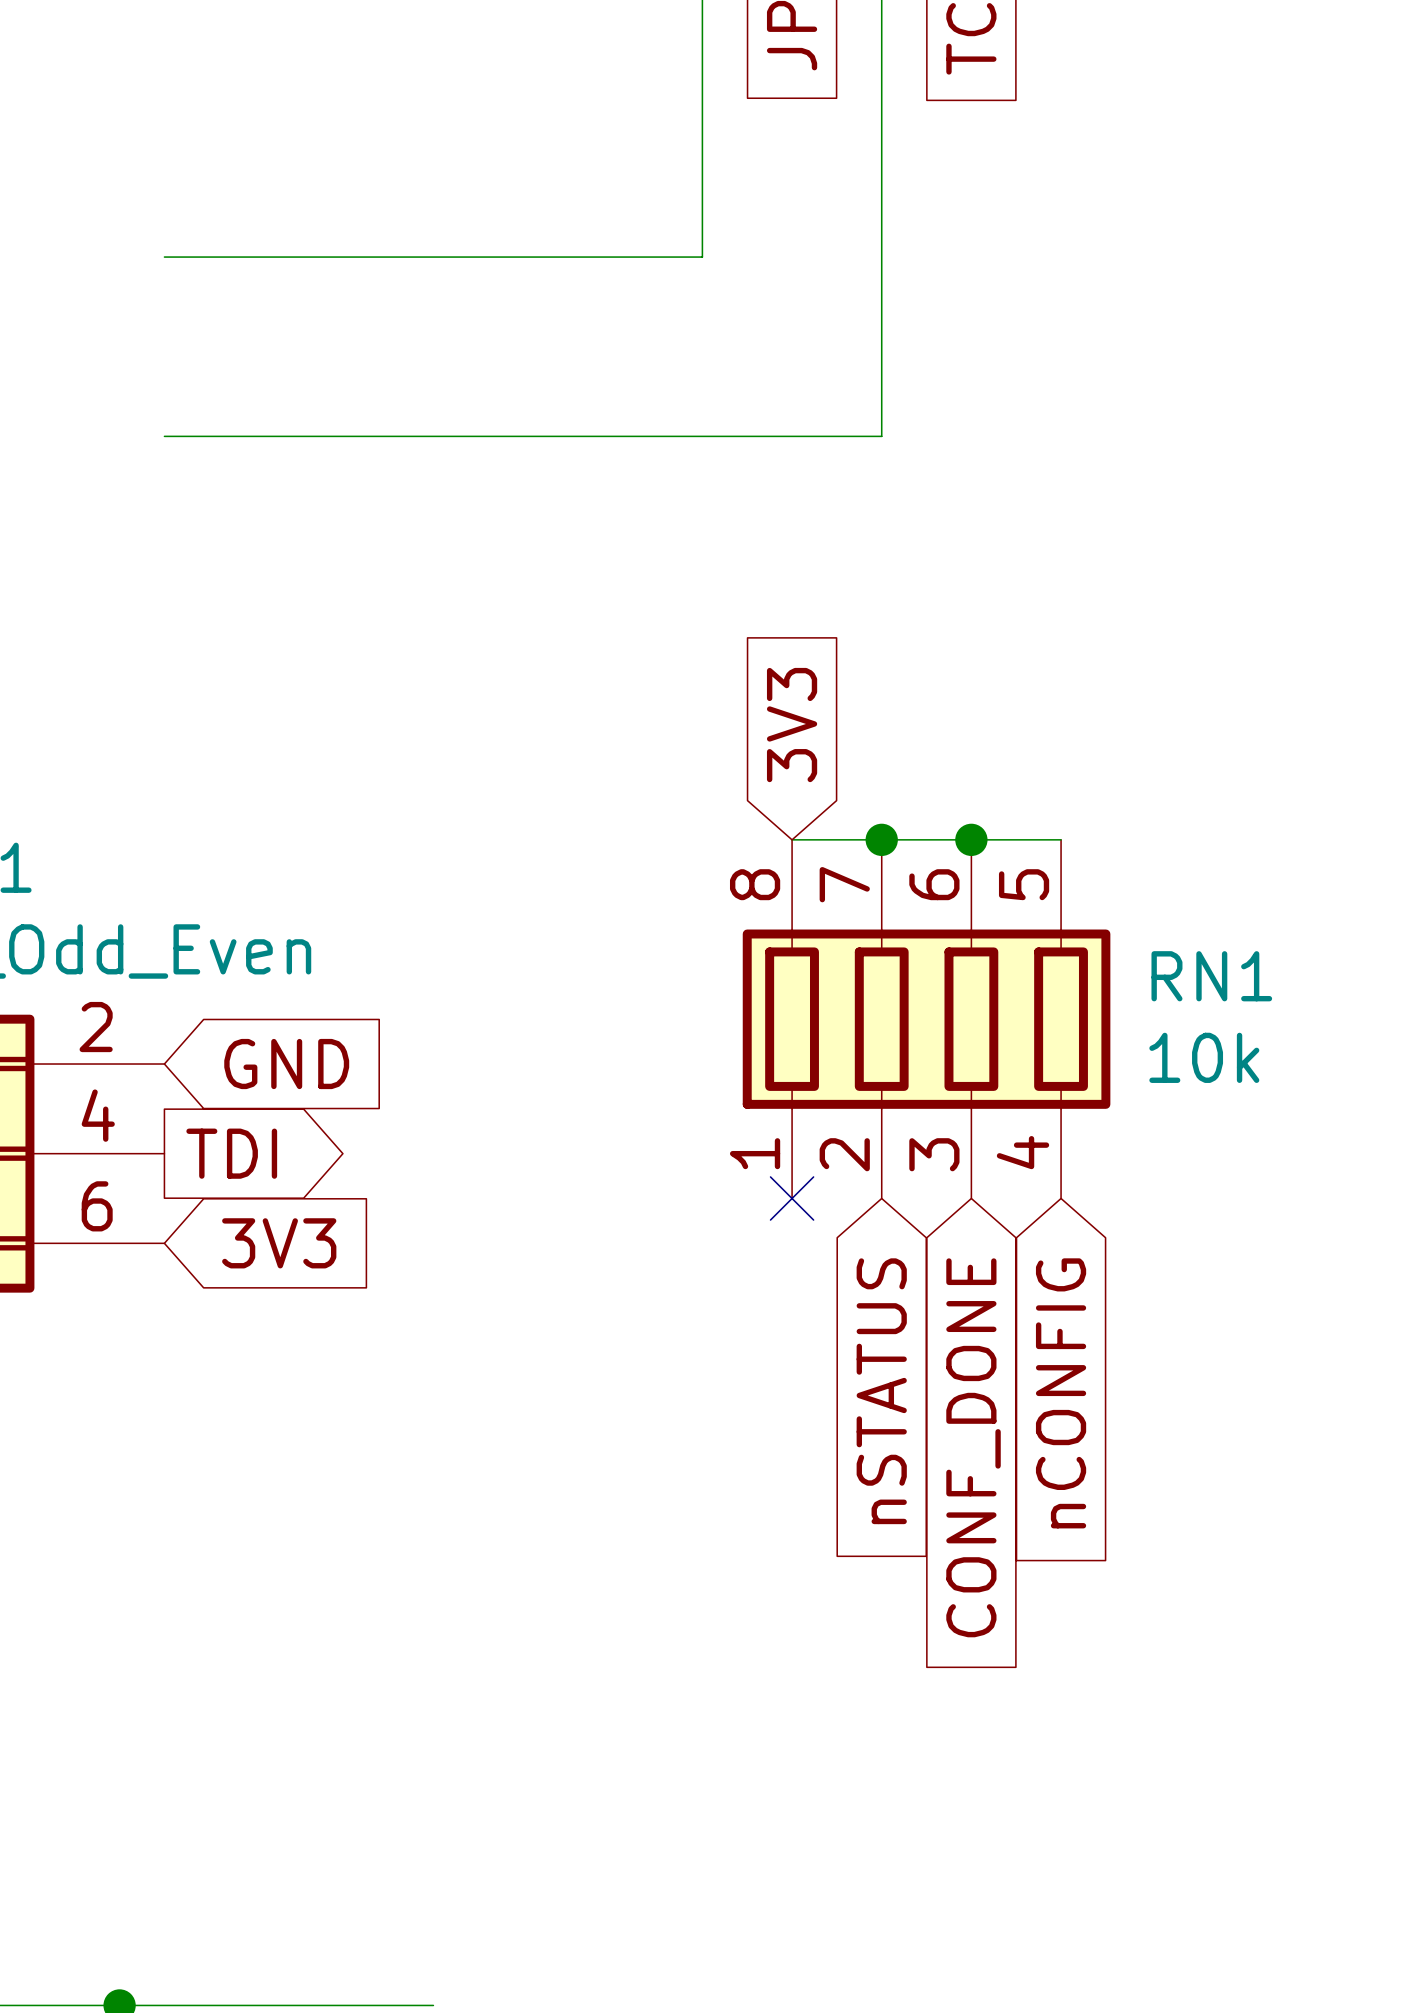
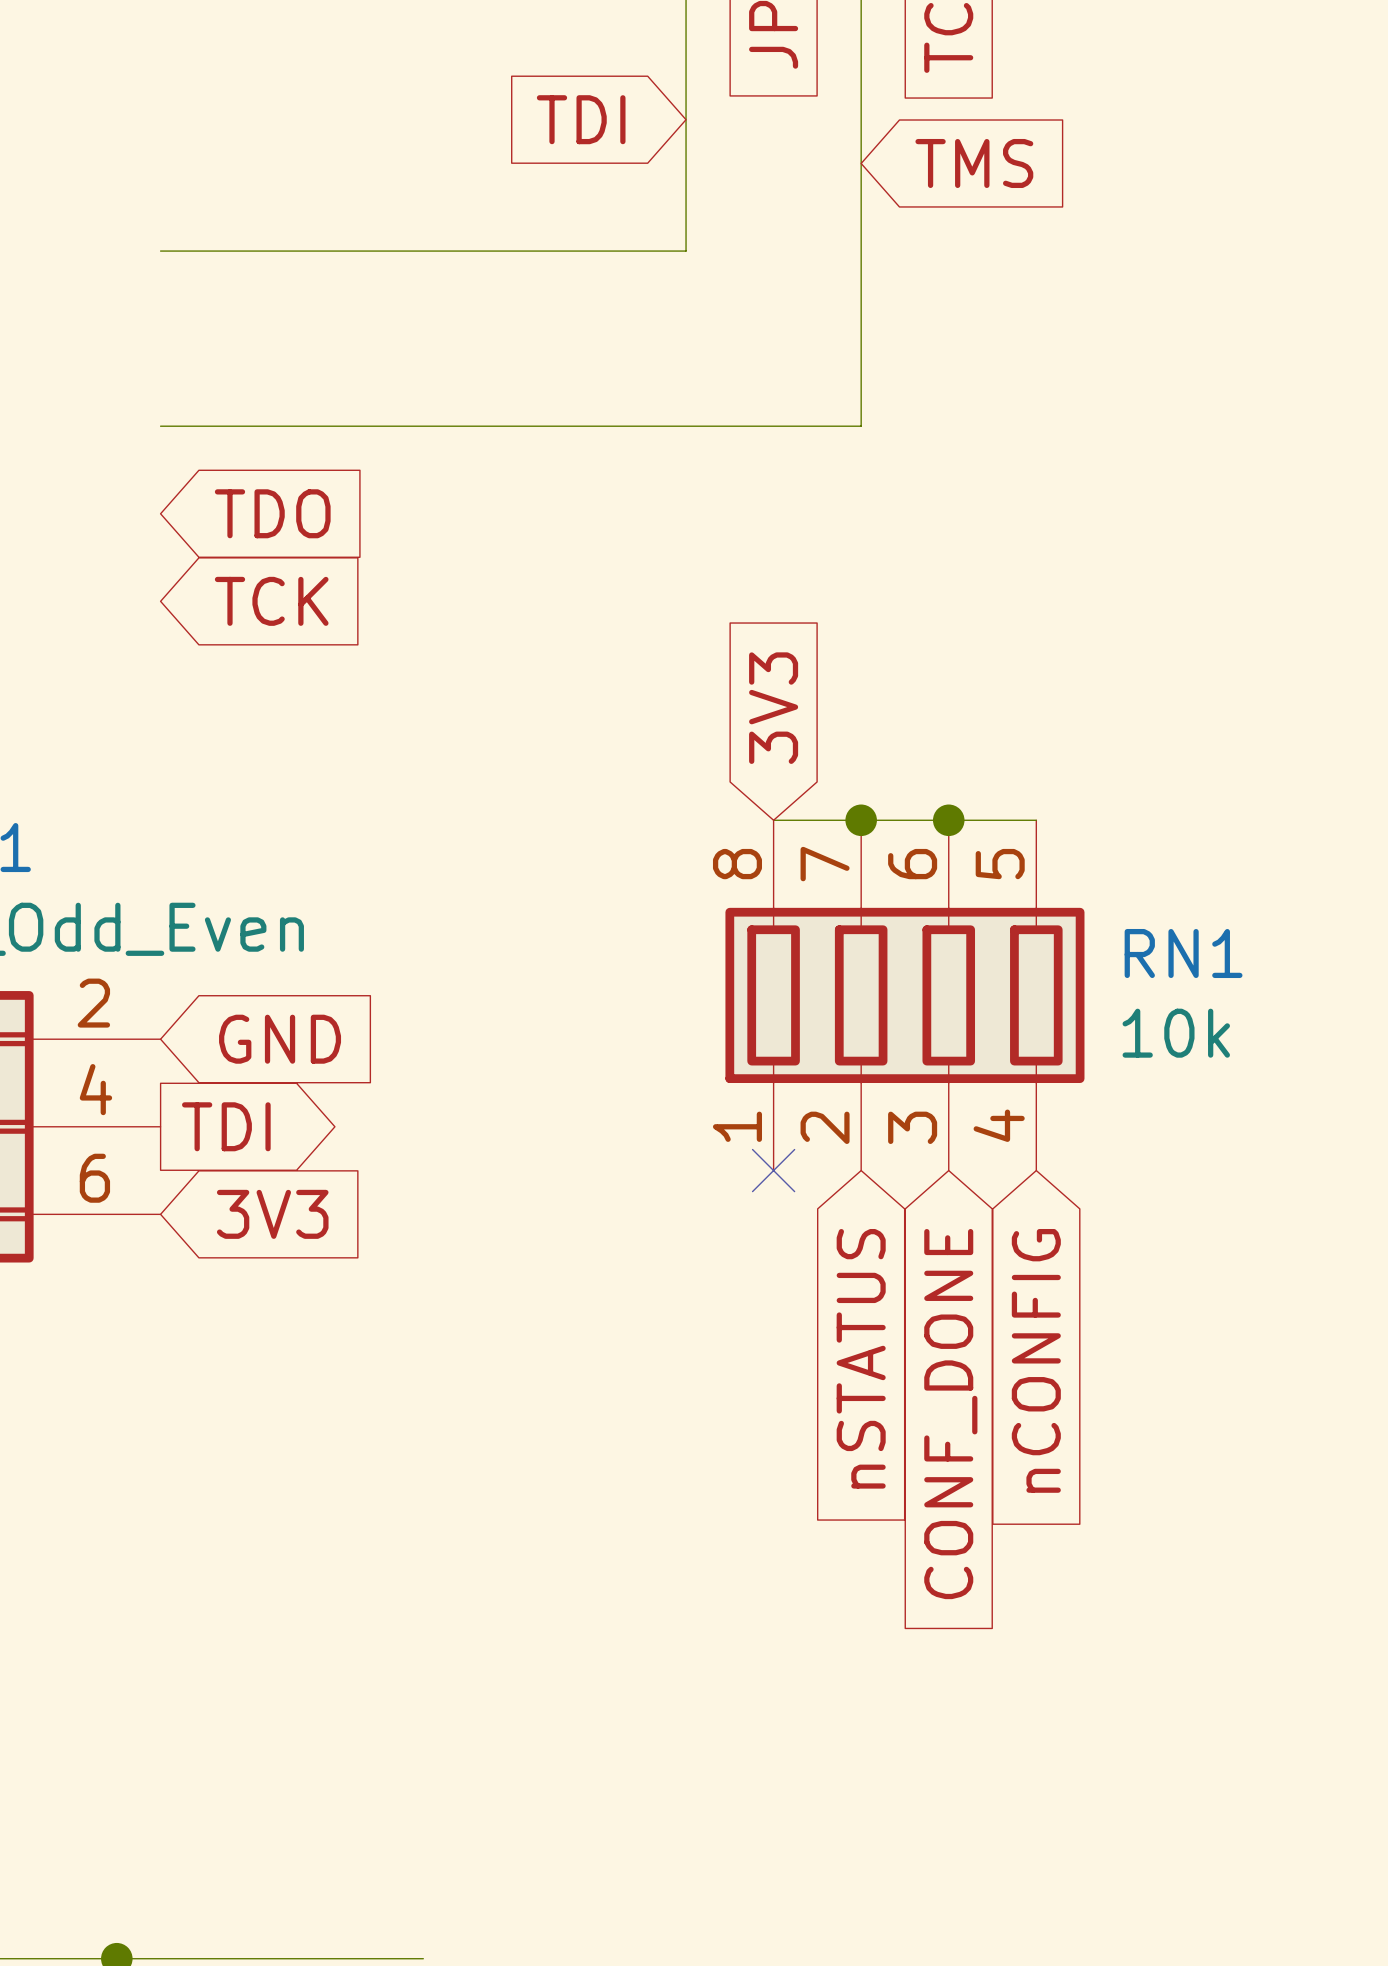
global label: none -> TDI (581, 119)
global label: none -> TMS (974, 163)
global label: none -> TDO (272, 513)
global label: none -> TCK (271, 601)

